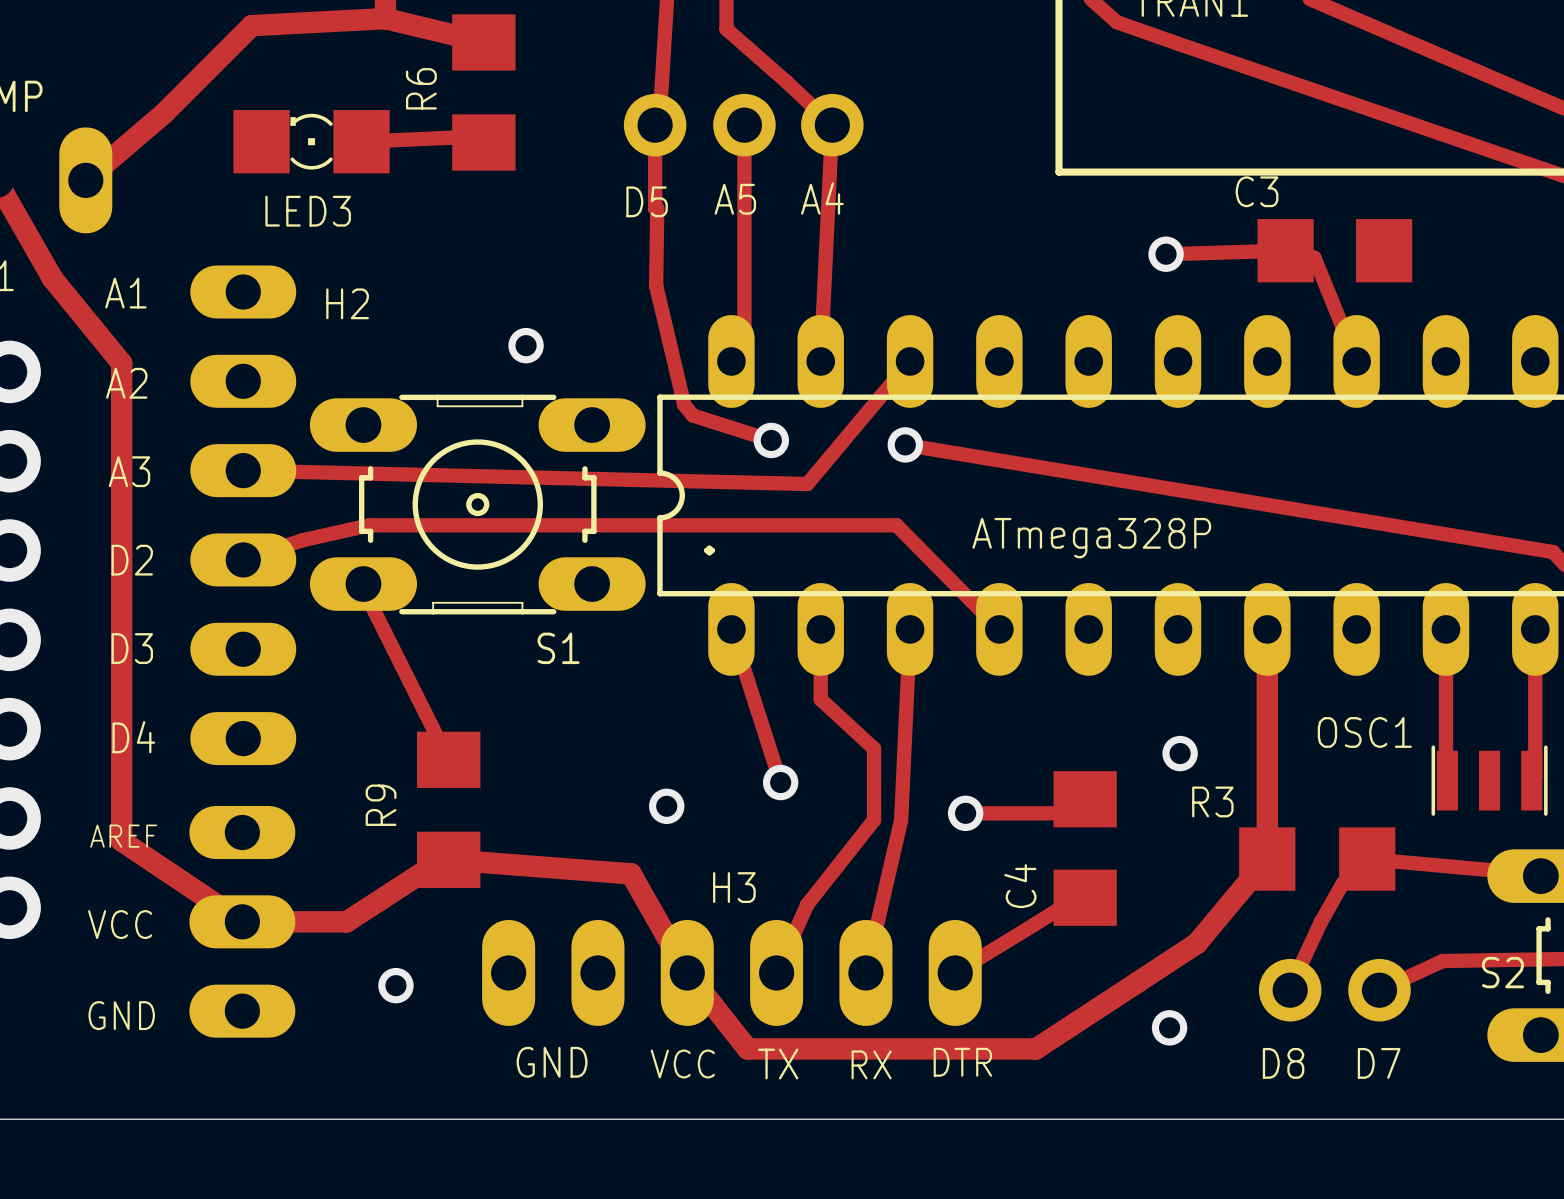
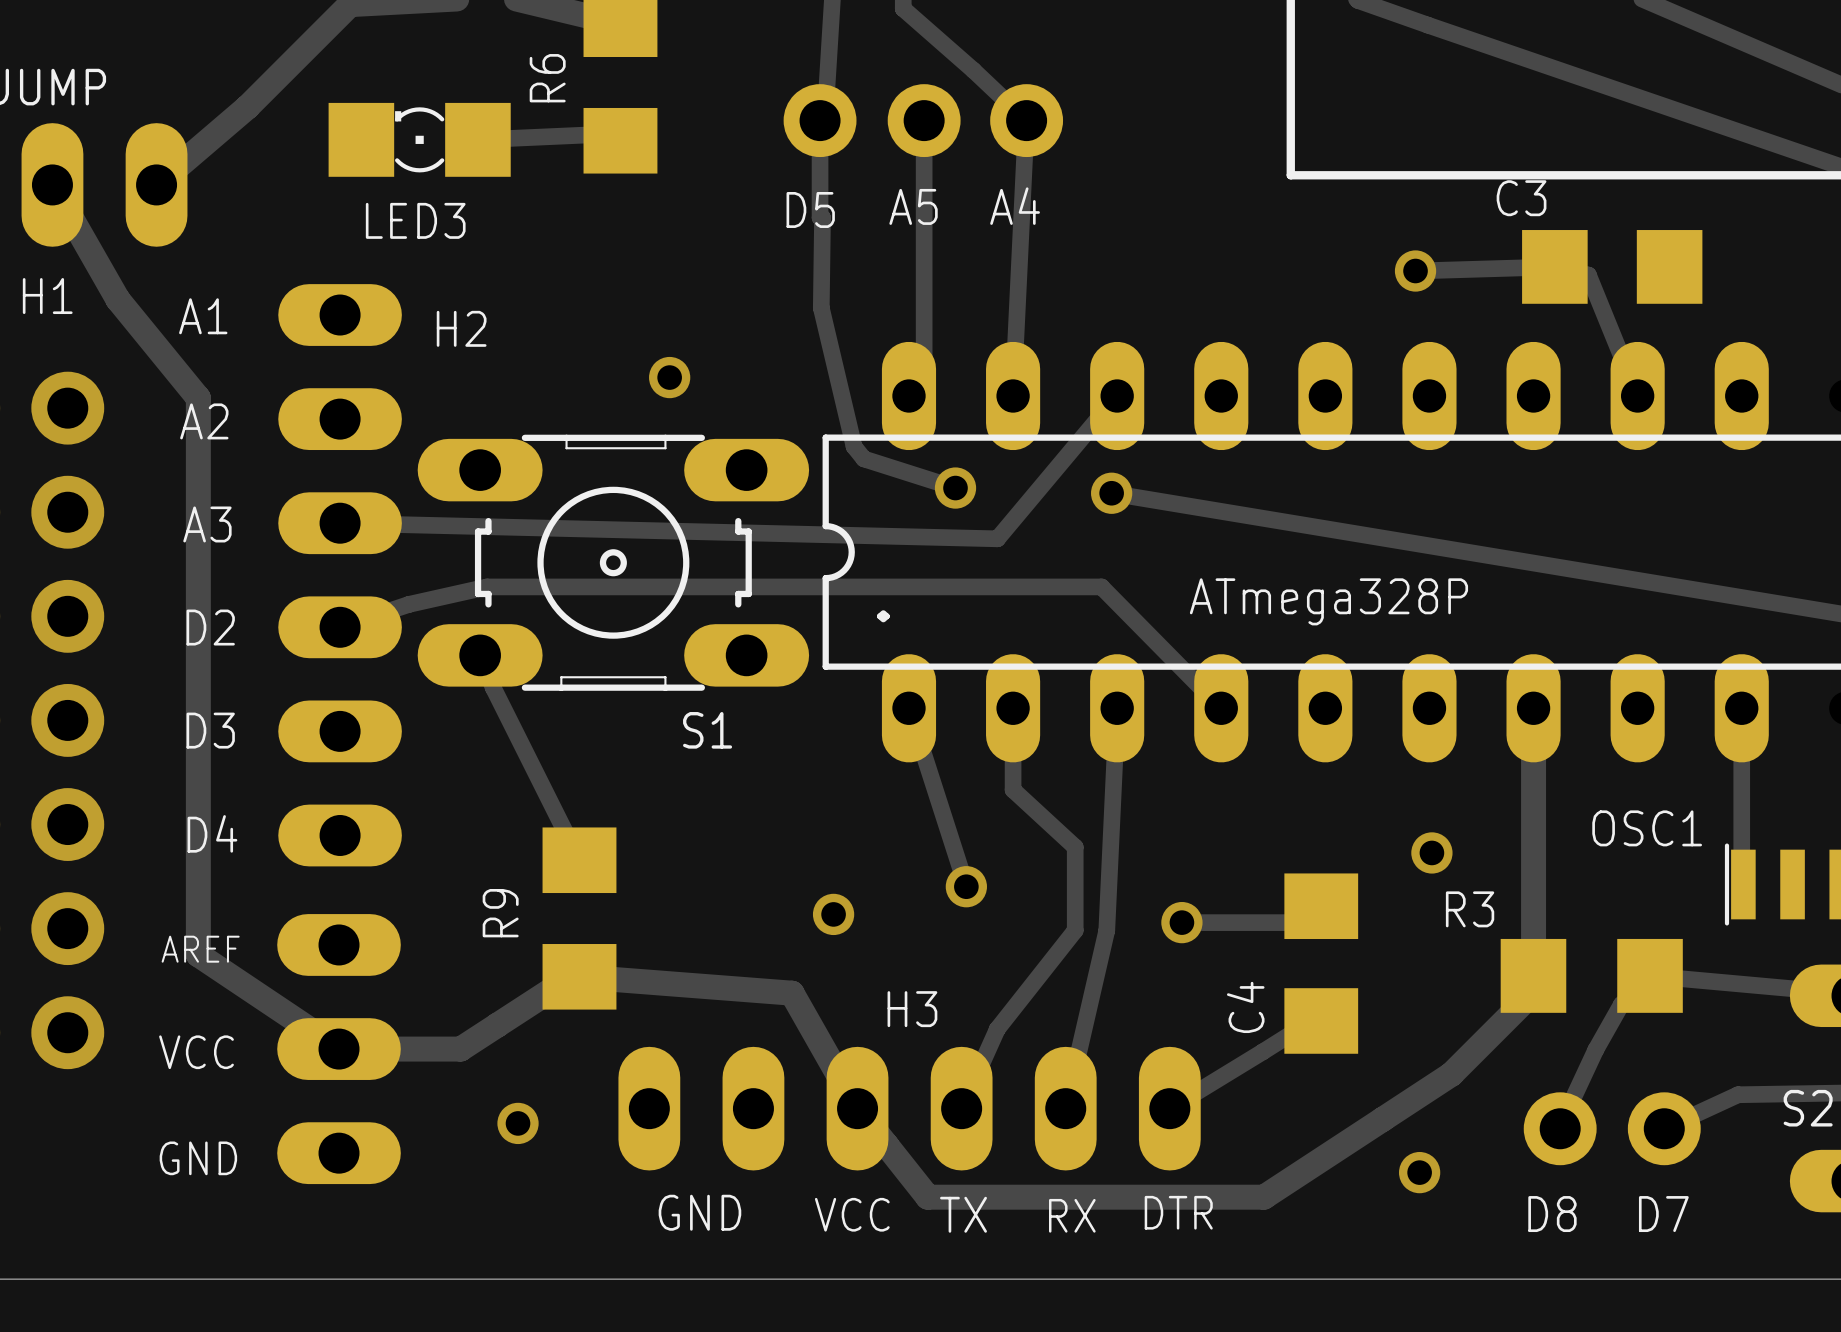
track: (1267, 873) (1267, 859) (1196, 943) -> (1533, 992) (1451, 1074)

